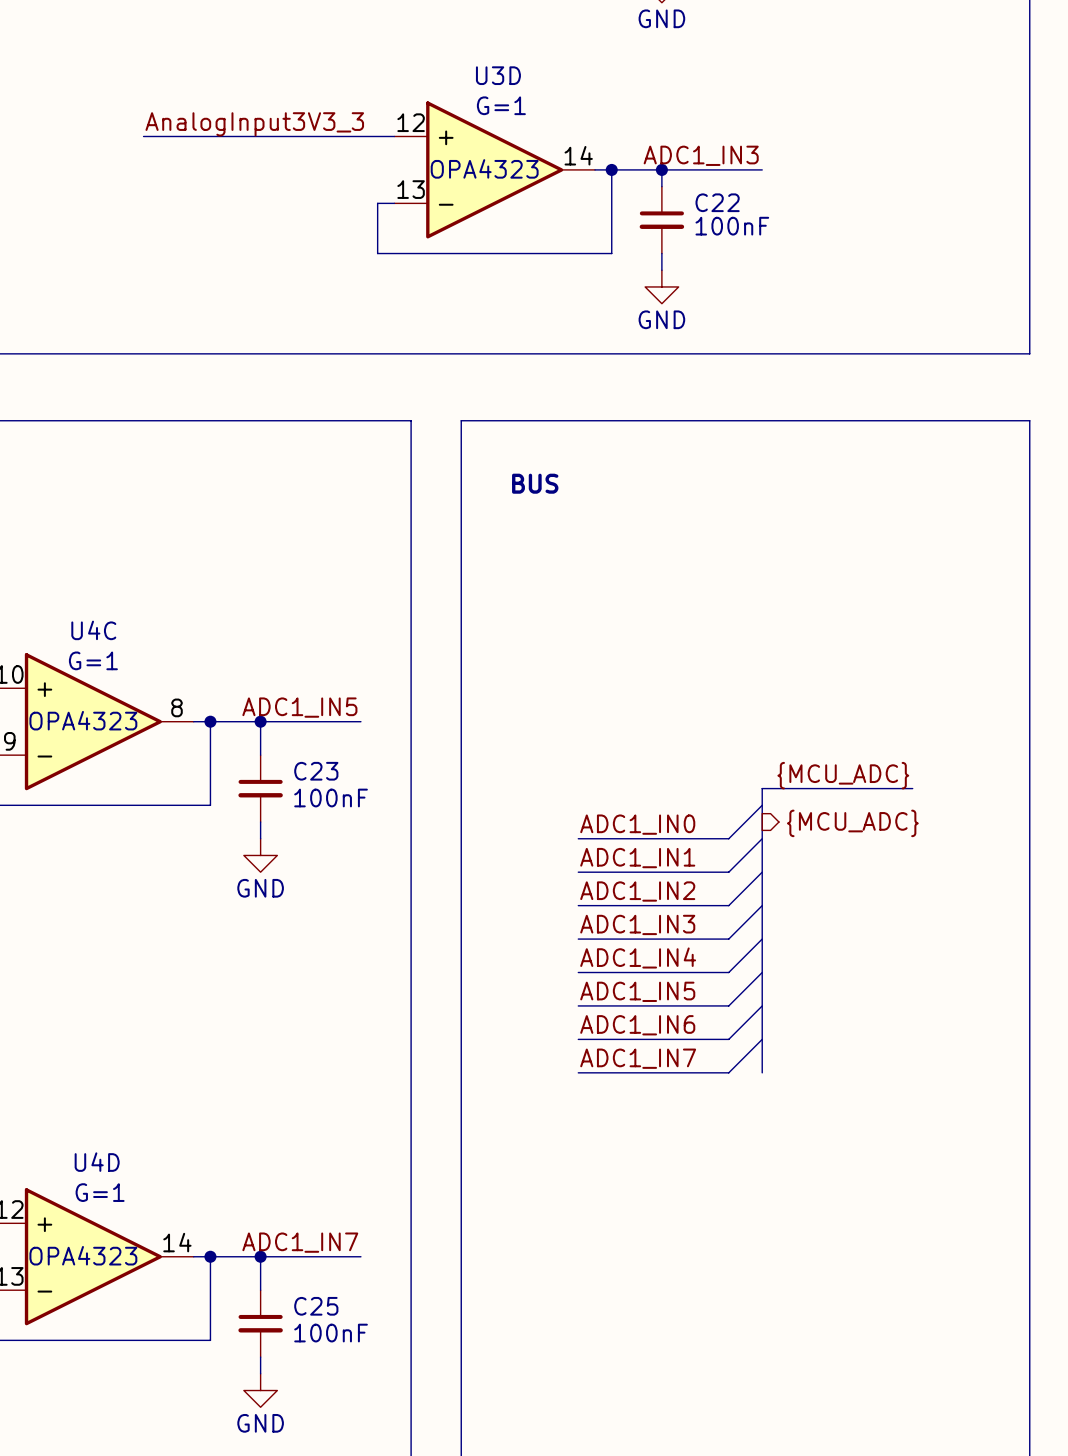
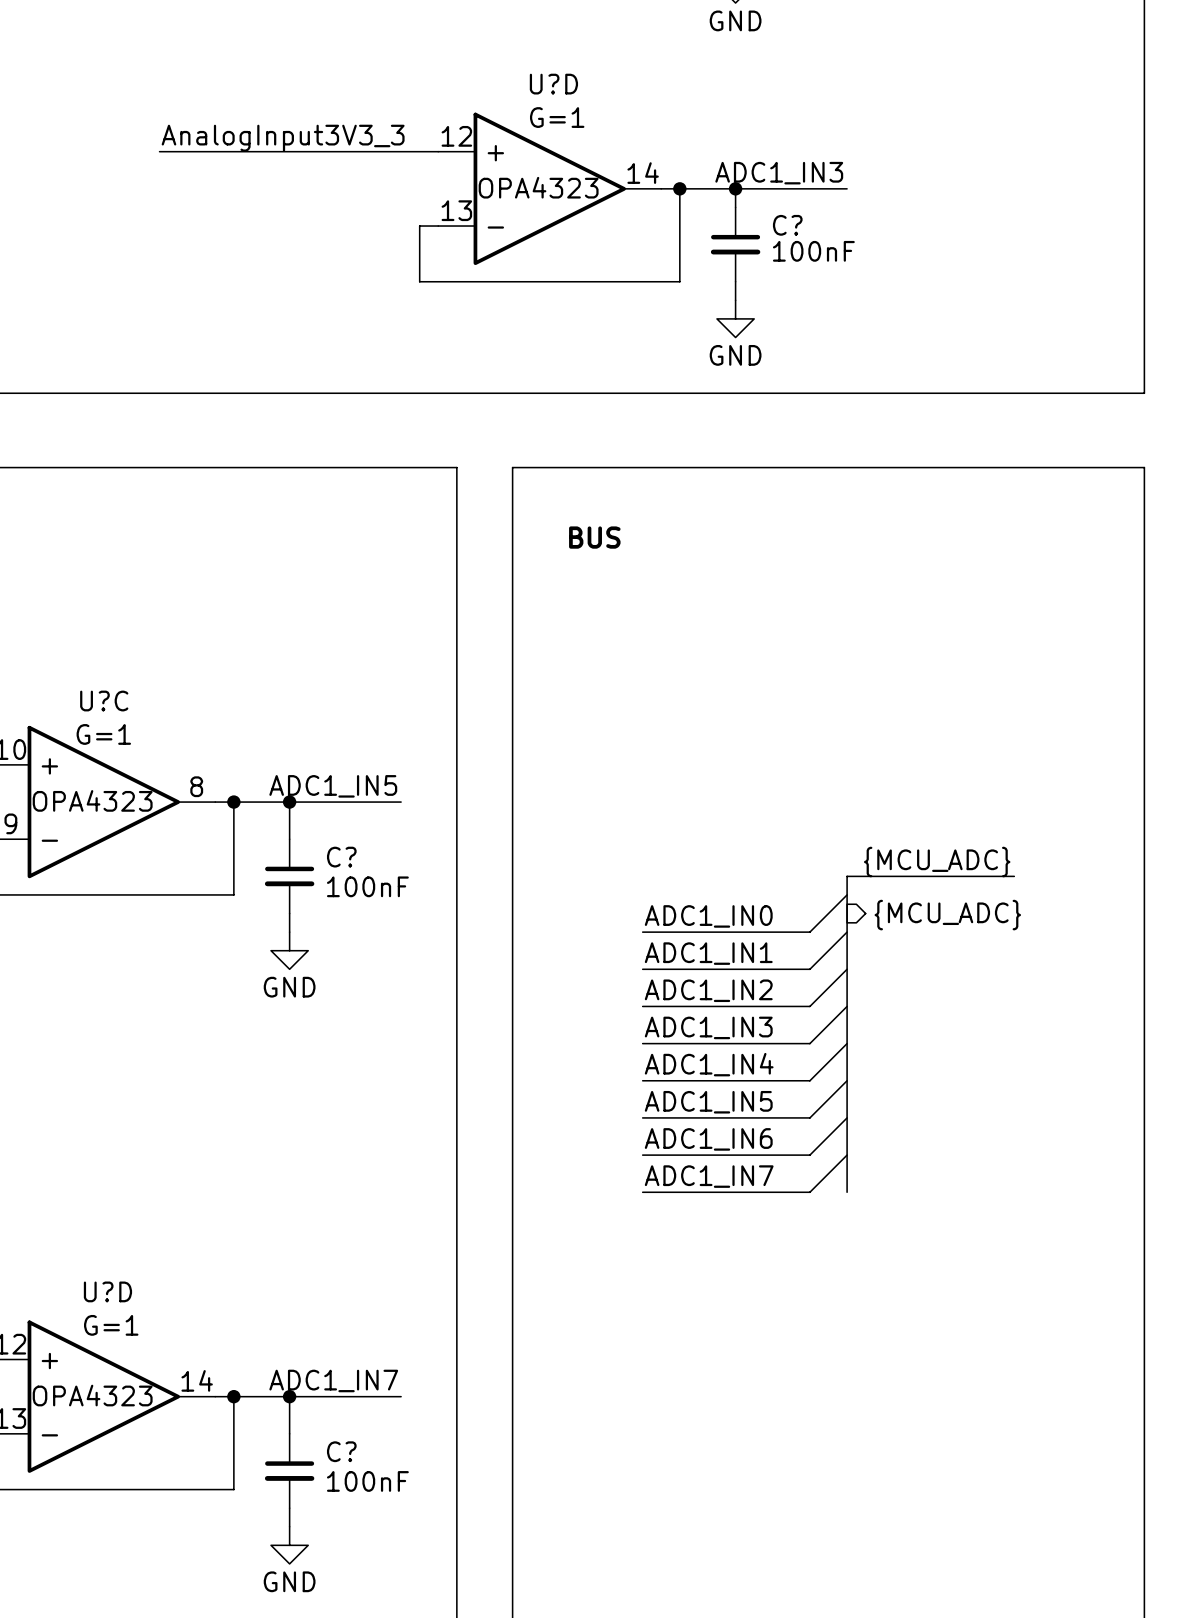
U3D name: U3D (498, 75) -> U?D (553, 84)
C22 name: C22 (717, 202) -> C? (787, 225)
U4C name: U4C (93, 630) -> U?C (104, 701)
C23 name: C23 (316, 771) -> C? (341, 857)
U4D name: U4D (97, 1162) -> U?D (107, 1291)
C25 name: C25 (316, 1306) -> C? (341, 1451)

